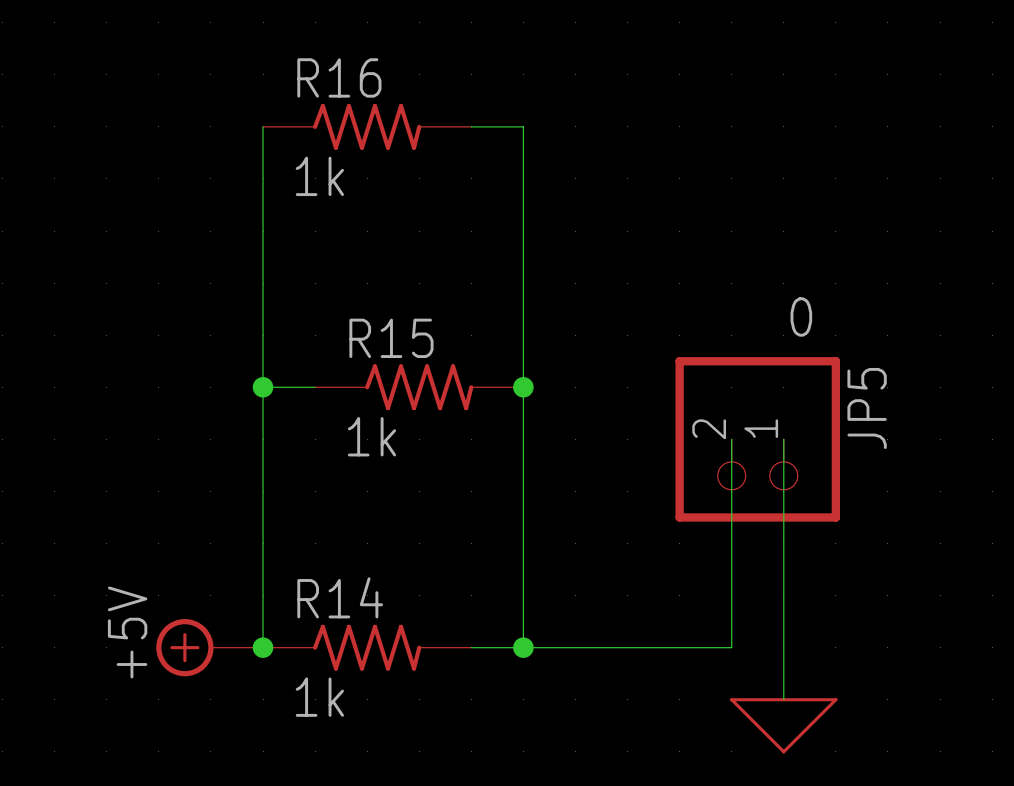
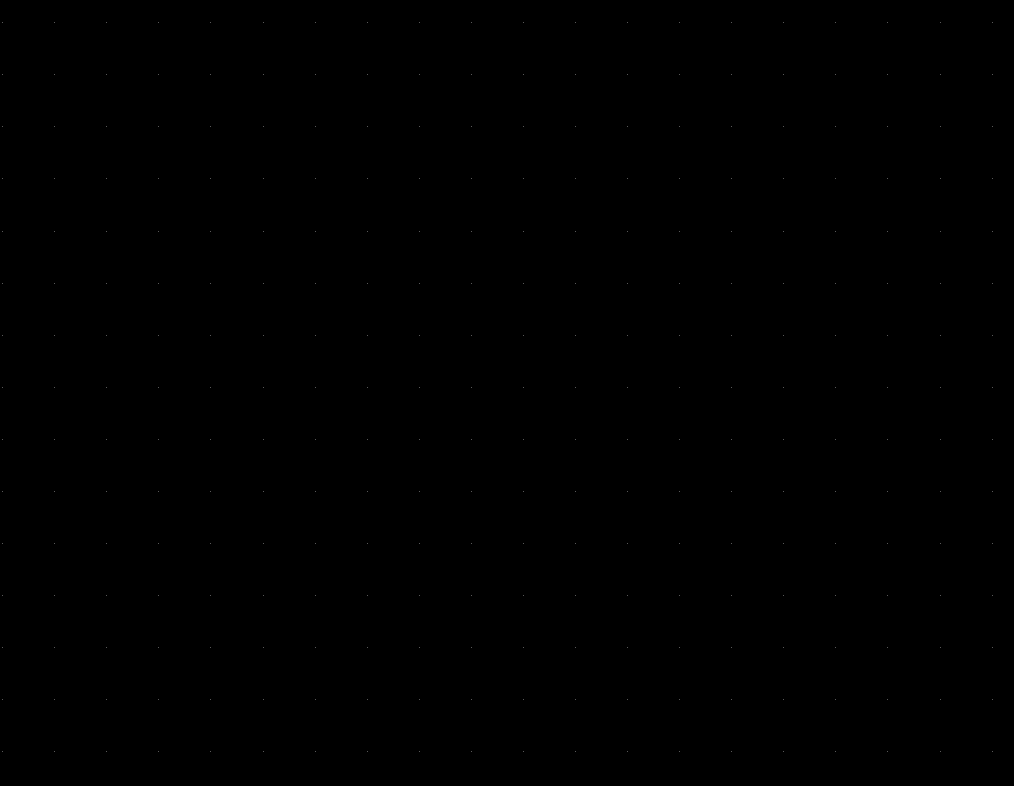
wire: (263, 126) (263, 647) -> none
R16: 1k (367, 126) -> none
wire: (471, 126) (523, 126) (523, 647) -> none
label: 0 (801, 316) -> none
wire: (263, 387) (315, 387) -> none
junction: (263, 387) -> none
R15: 1k (419, 387) -> none
junction: (523, 387) -> none
wire: (731, 439) (731, 647) (471, 647) -> none
JP5: (757, 439) -> none
wire: (783, 439) (783, 699) -> none
power symbol: +5V (209, 647) -> none
junction: (263, 647) -> none
R14: 1k (367, 647) -> none
junction: (523, 647) -> none
power symbol: (783, 725) -> none

